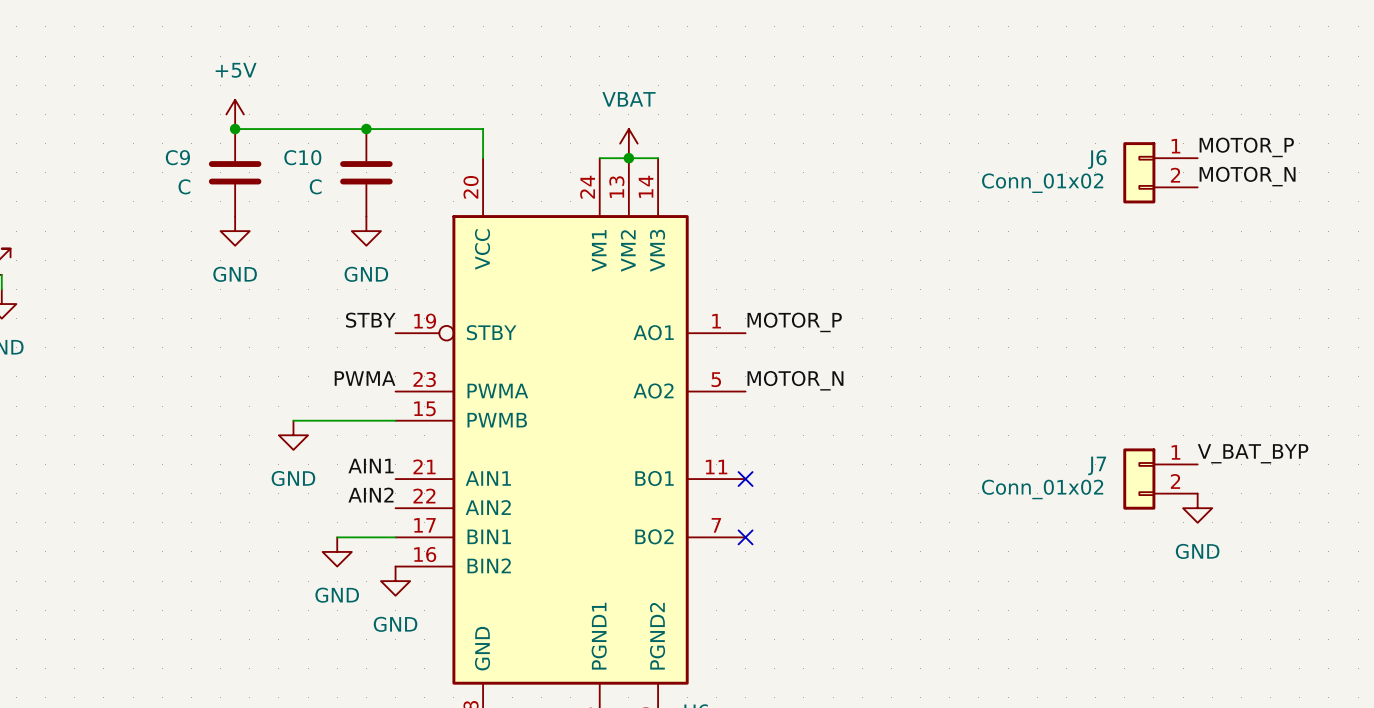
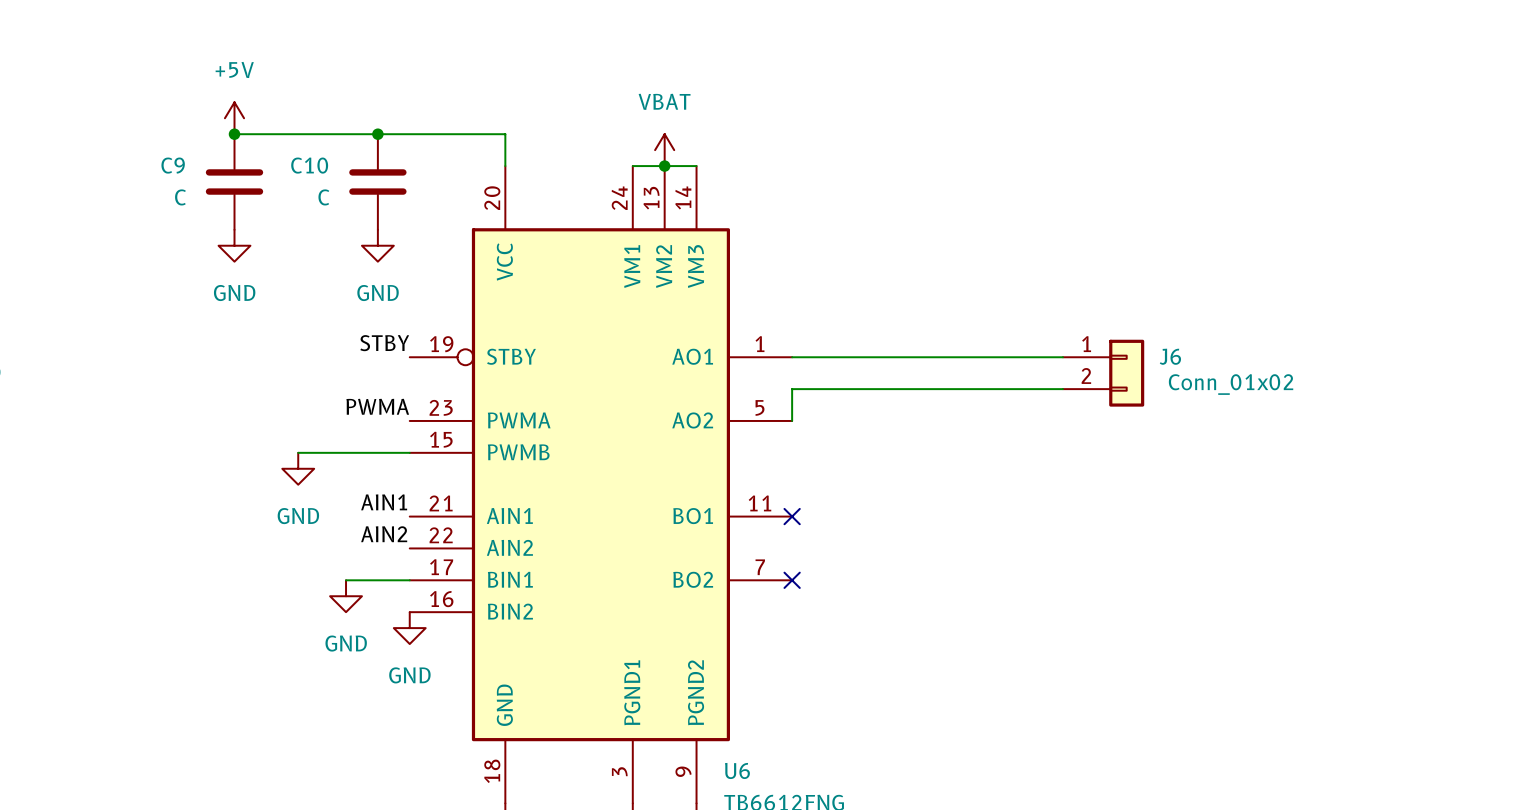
label: MOTOR_P (1246, 147) -> none
J6 flip: as is (1139, 172) -> left-right (1126, 373)
J6 position: (1160, 172) -> (1103, 373)
label: MOTOR_N (1247, 176) -> none
label: MOTOR_P (794, 322) -> none
wire: none -> (792, 357) (1062, 357)
wire: none -> (1062, 389) (792, 389) (792, 420)
label: MOTOR_N (795, 380) -> none
label: V_BAT_BYP (1253, 453) -> none
J7: Conn_01x02 (1160, 479) -> none
power symbol: GND (1197, 508) -> none

